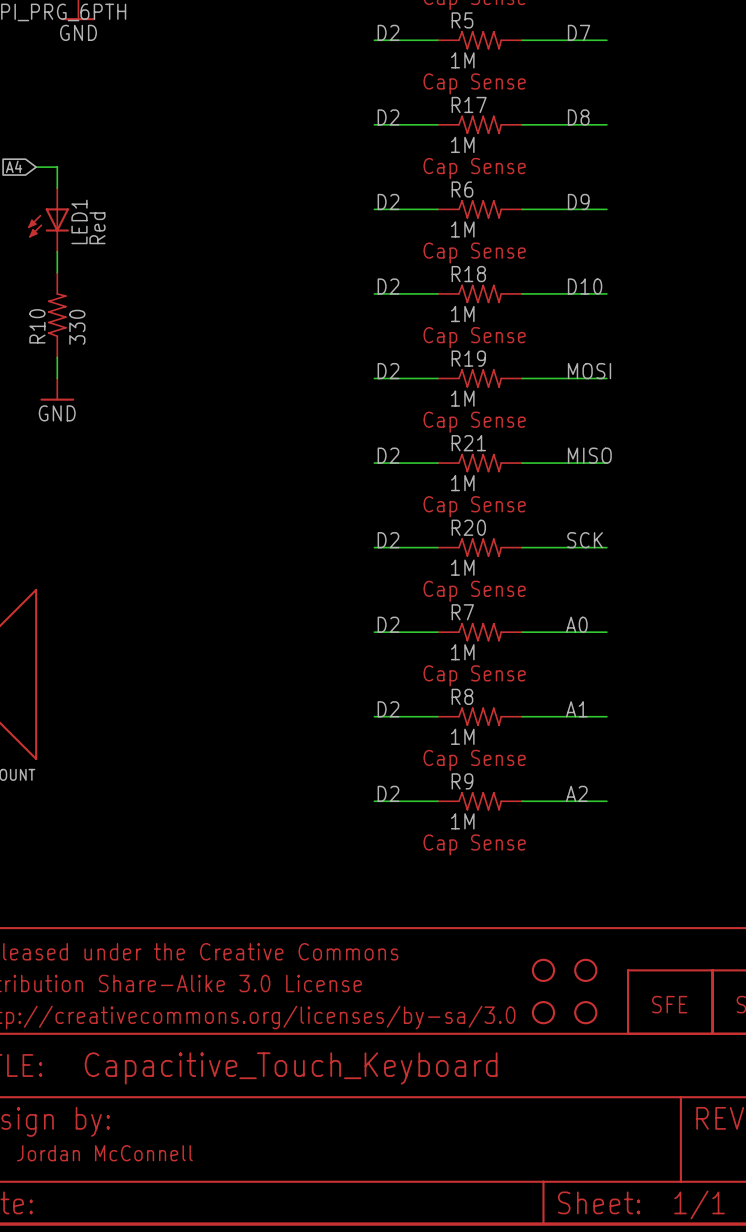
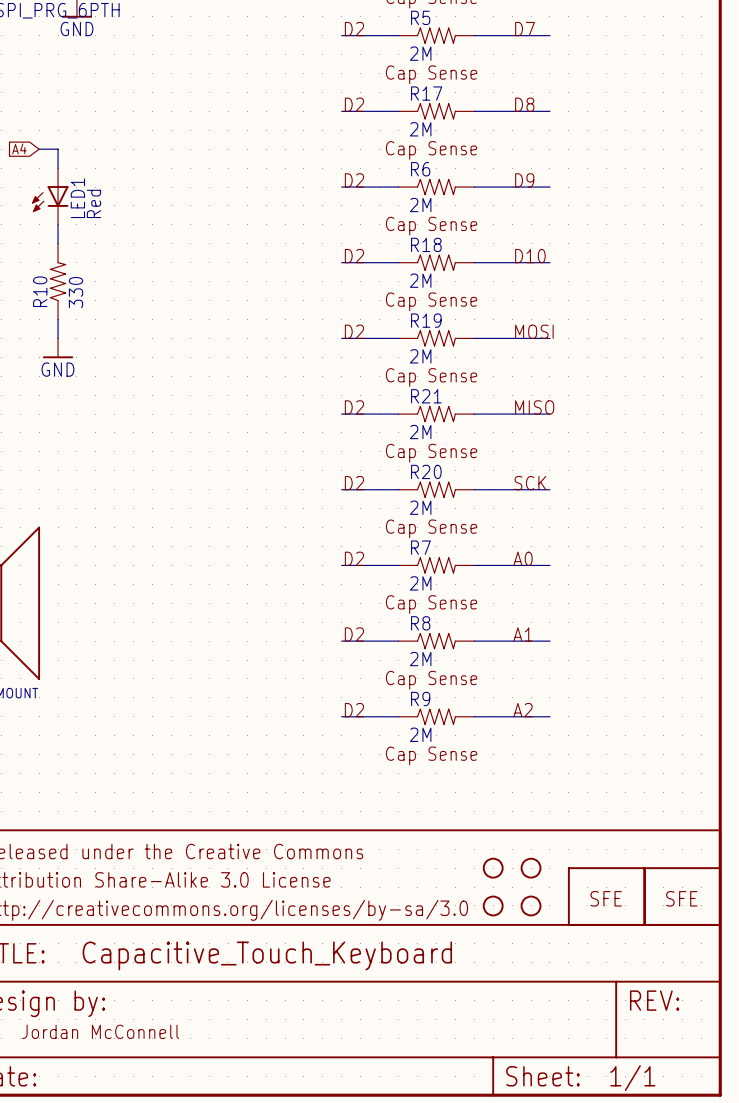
R5 value: 1M (462, 60) -> 2M (420, 53)
R17 value: 1M (462, 144) -> 2M (420, 129)
R6 value: 1M (462, 229) -> 2M (420, 204)
R18 value: 1M (462, 314) -> 2M (420, 280)
R19 value: 1M (462, 398) -> 2M (420, 356)
R21 value: 1M (462, 483) -> 2M (420, 432)
R20 value: 1M (462, 567) -> 2M (420, 507)
R7 value: 1M (462, 652) -> 2M (420, 583)
R8 value: 1M (462, 736) -> 2M (420, 659)
R9 value: 1M (462, 821) -> 2M (420, 734)

